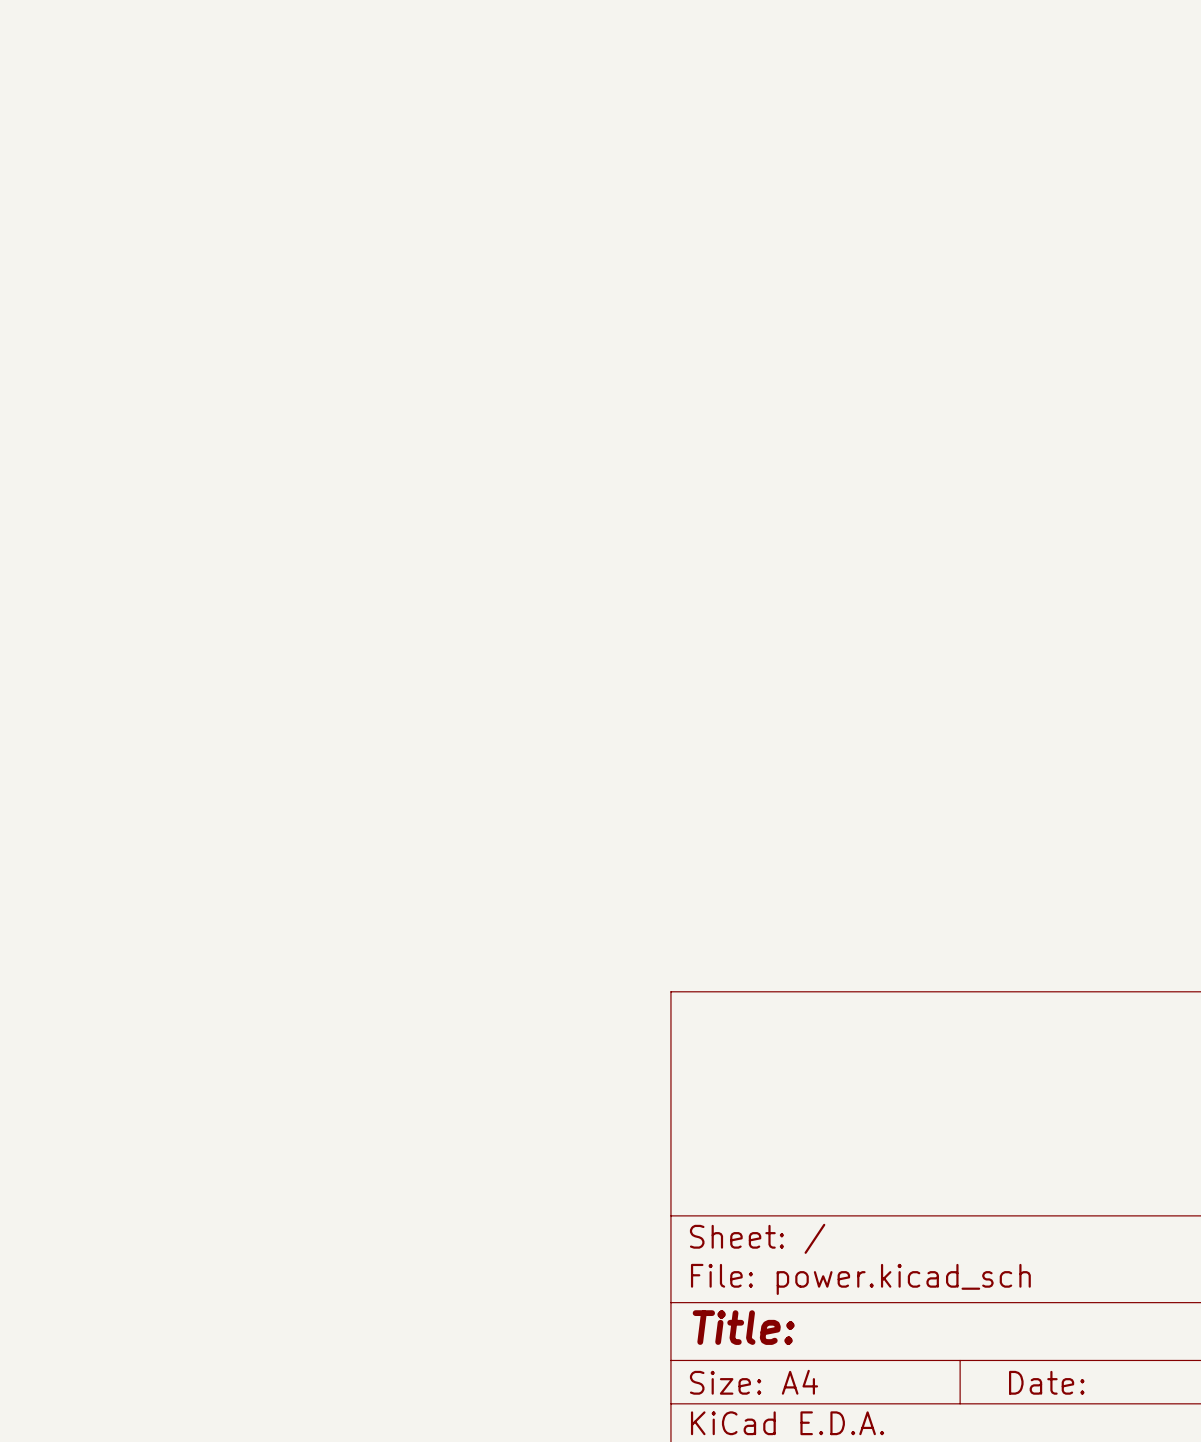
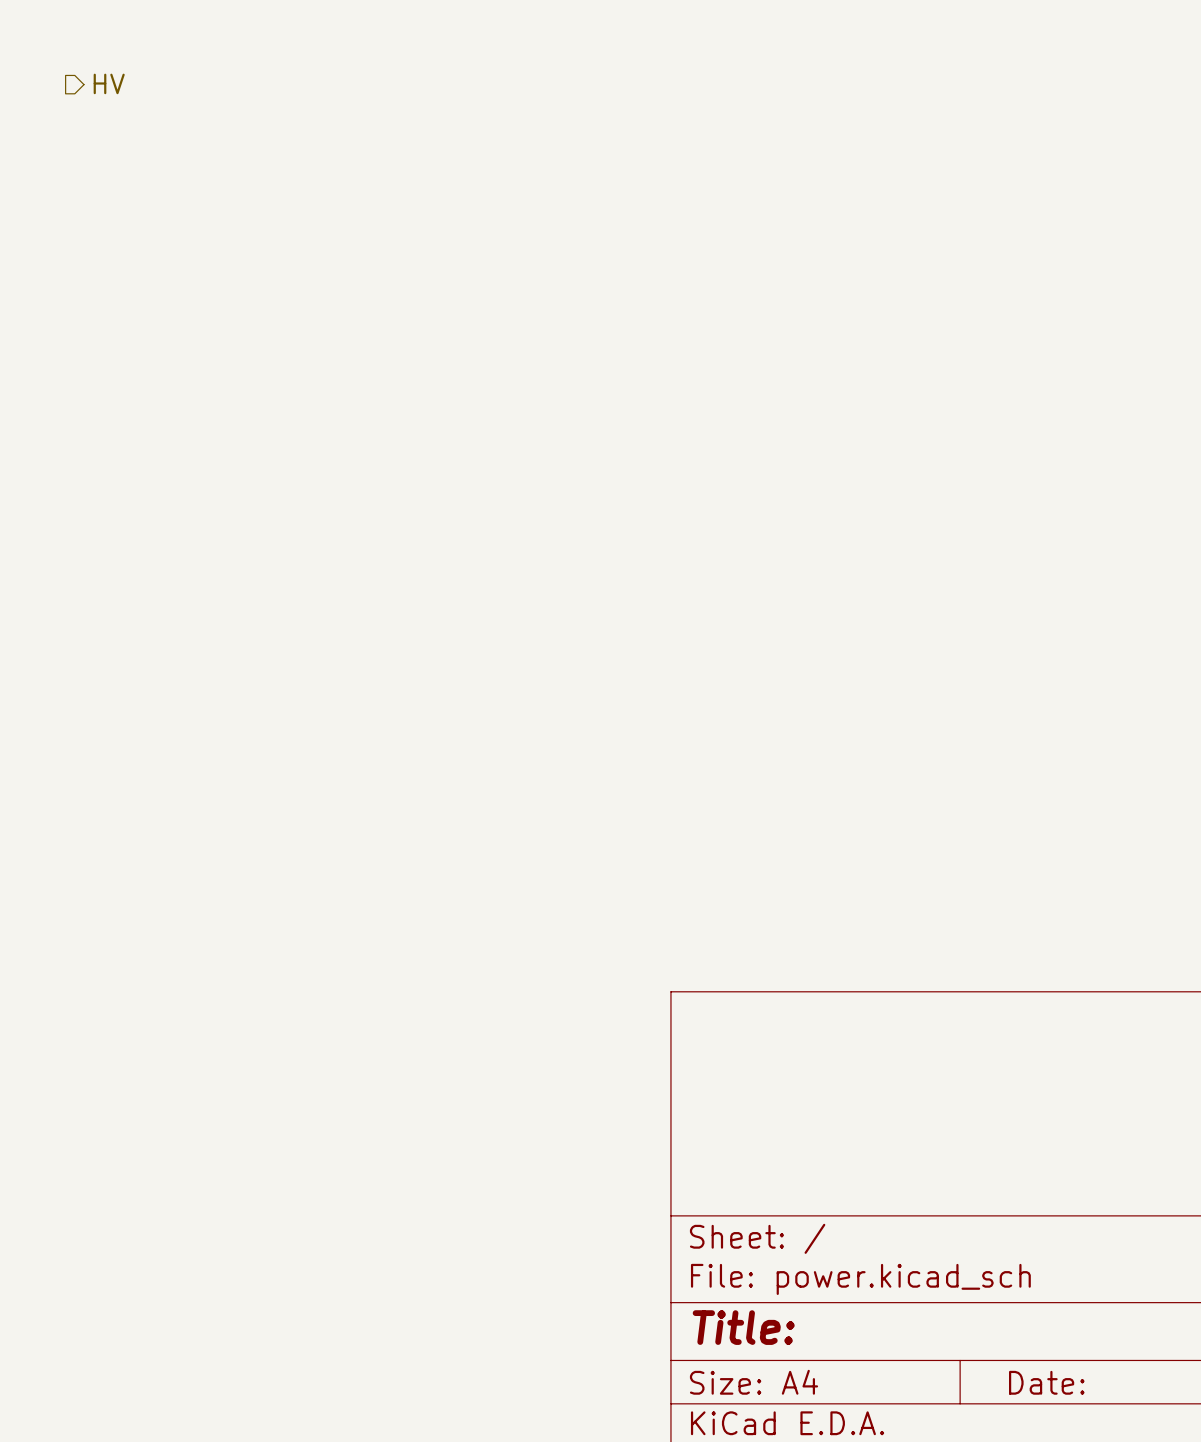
hierarchical label: none -> HV (109, 83)

